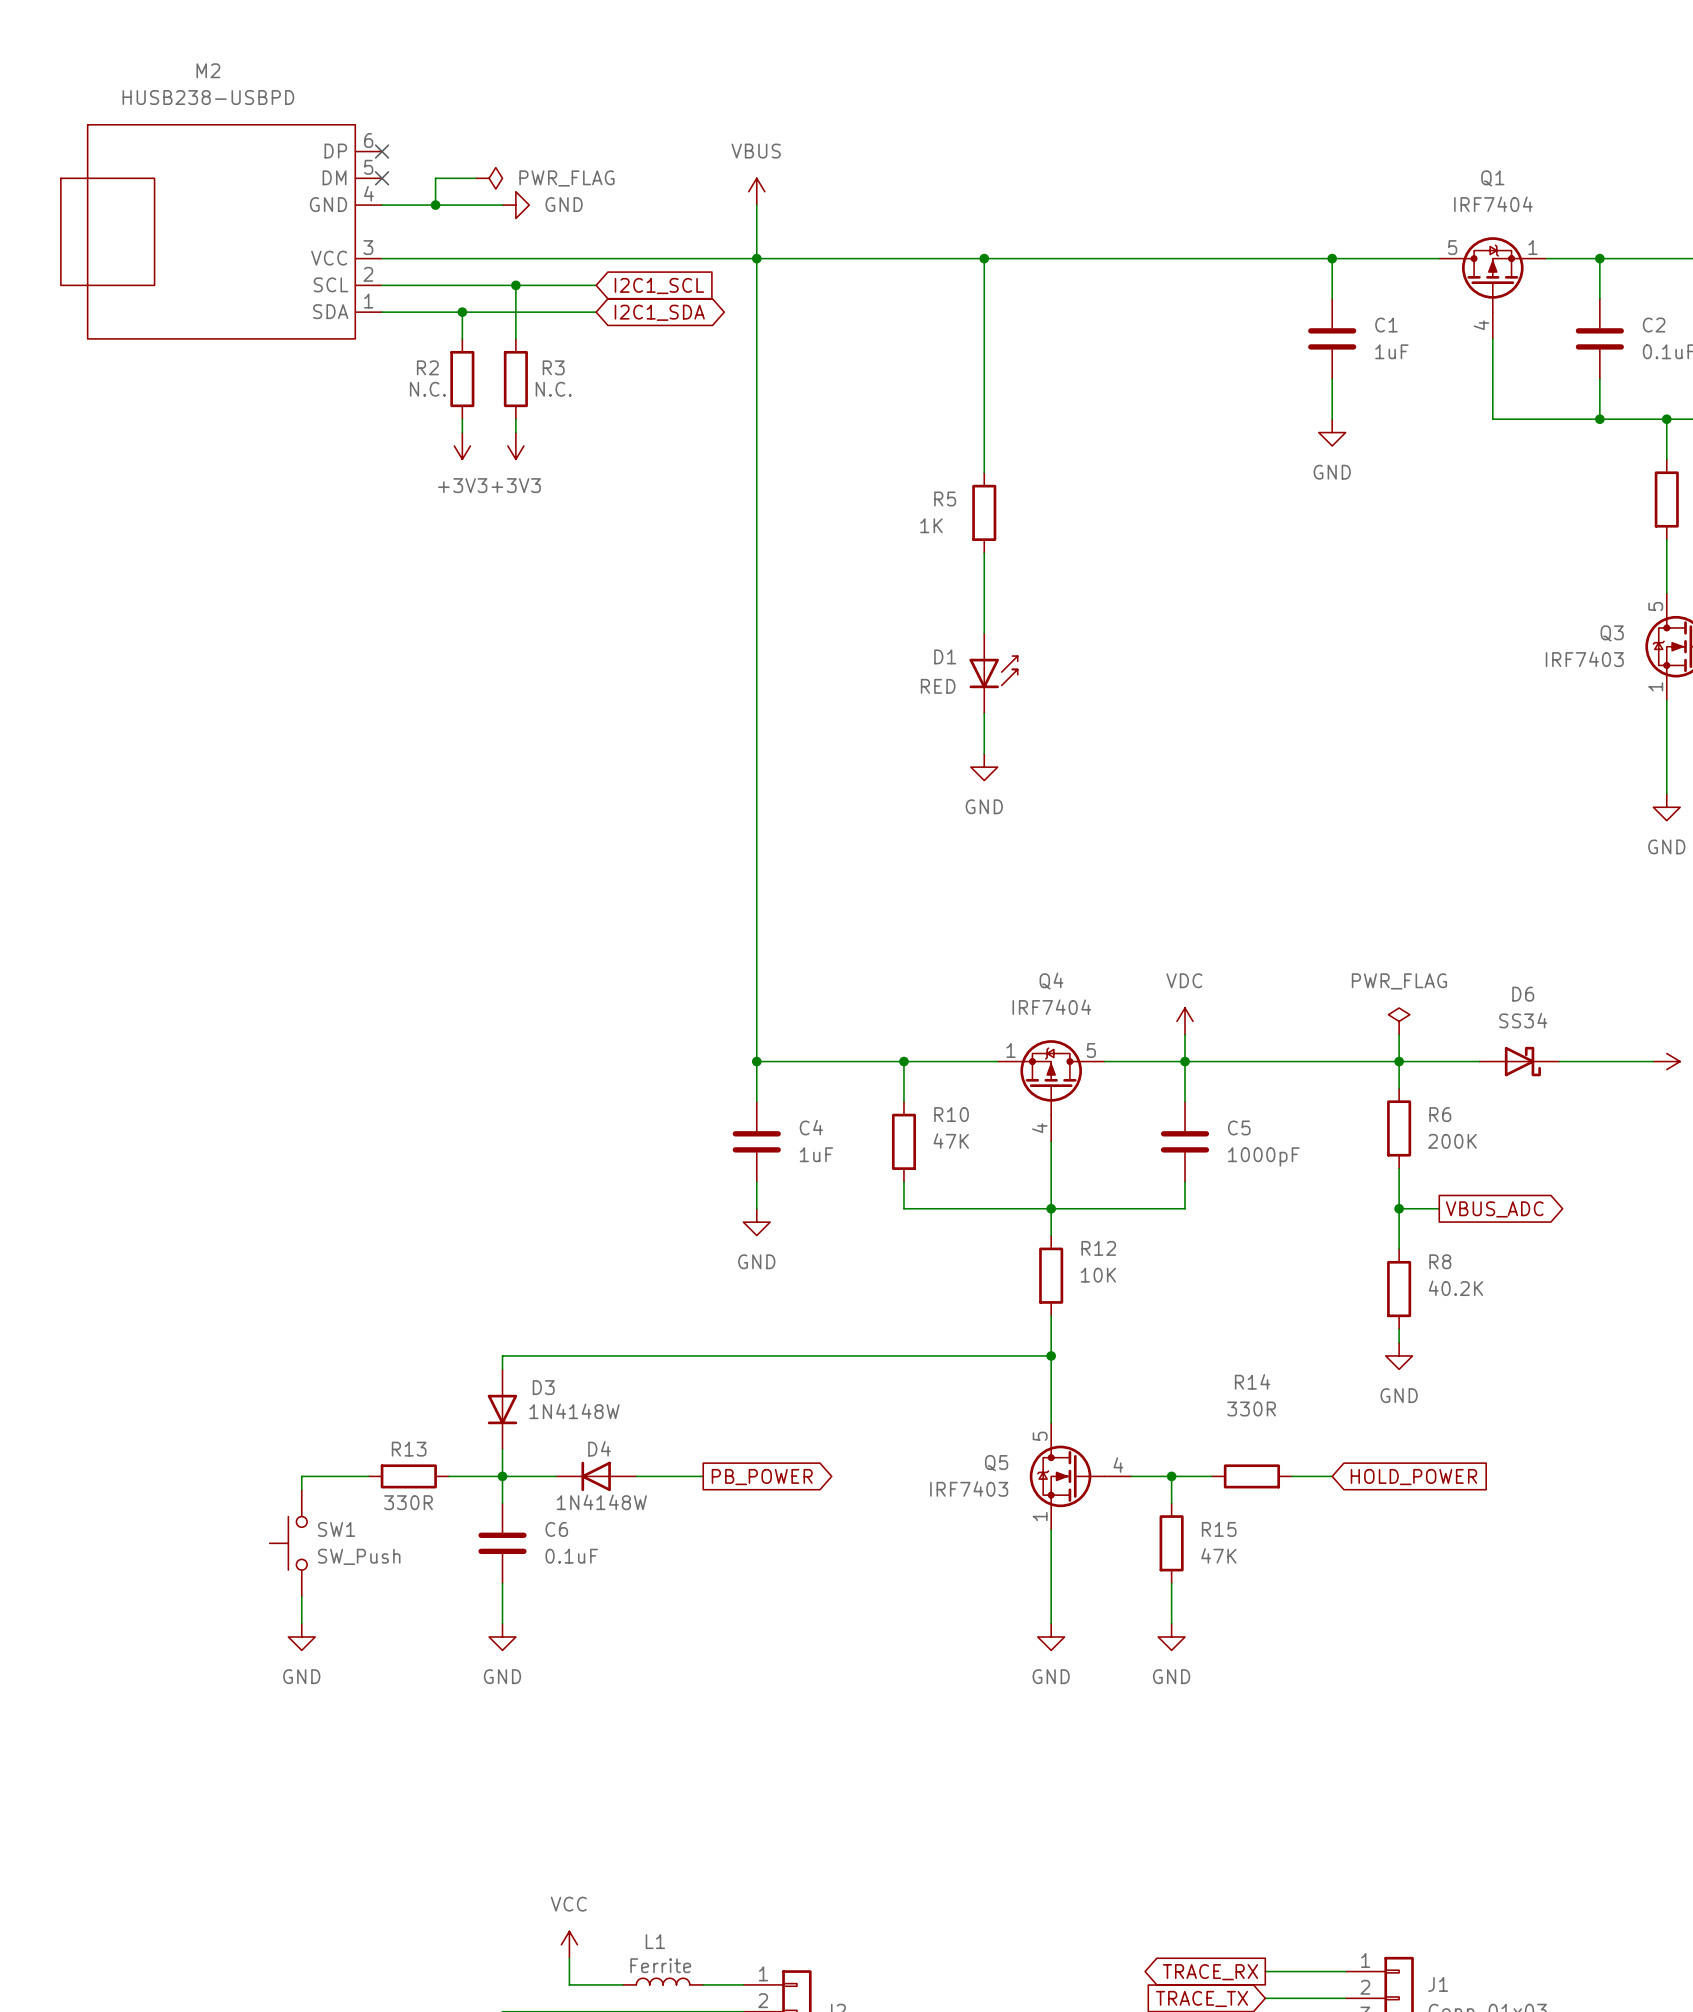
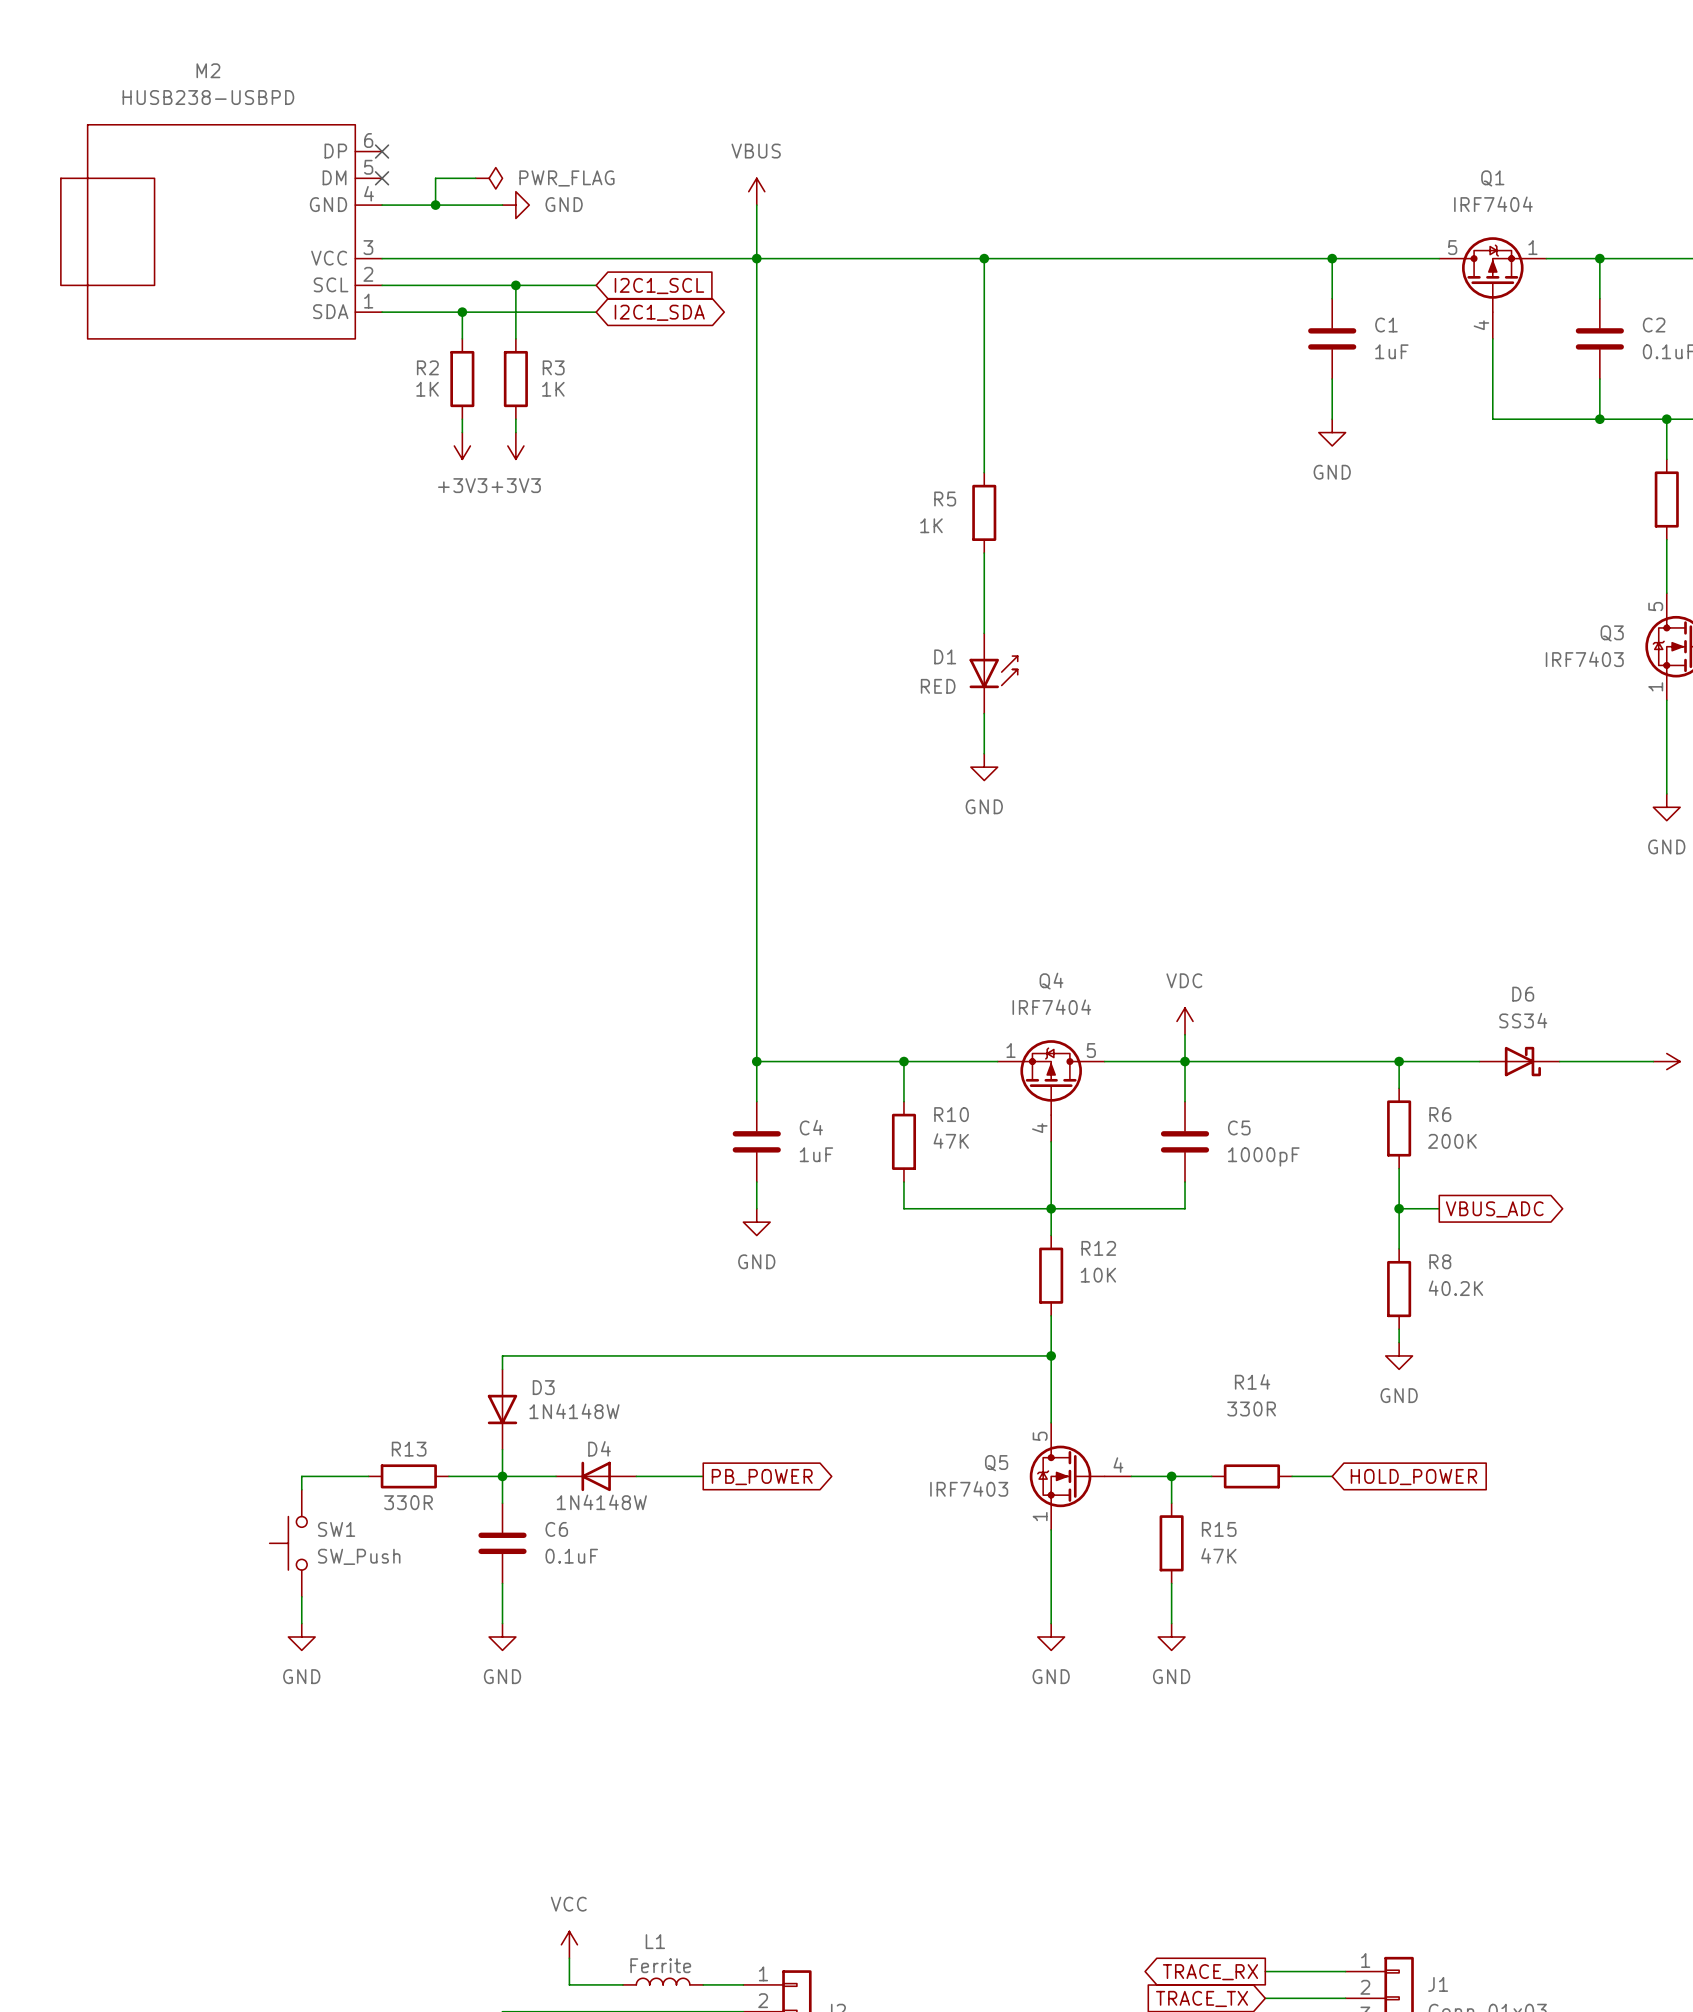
R2 value: N.C. (427, 389) -> 1K (427, 389)
R3 value: N.C. (553, 389) -> 1K (553, 389)
power symbol: PWR_FLAG (1399, 1021) -> none
wire: (1399, 1034) (1399, 1061) -> none

